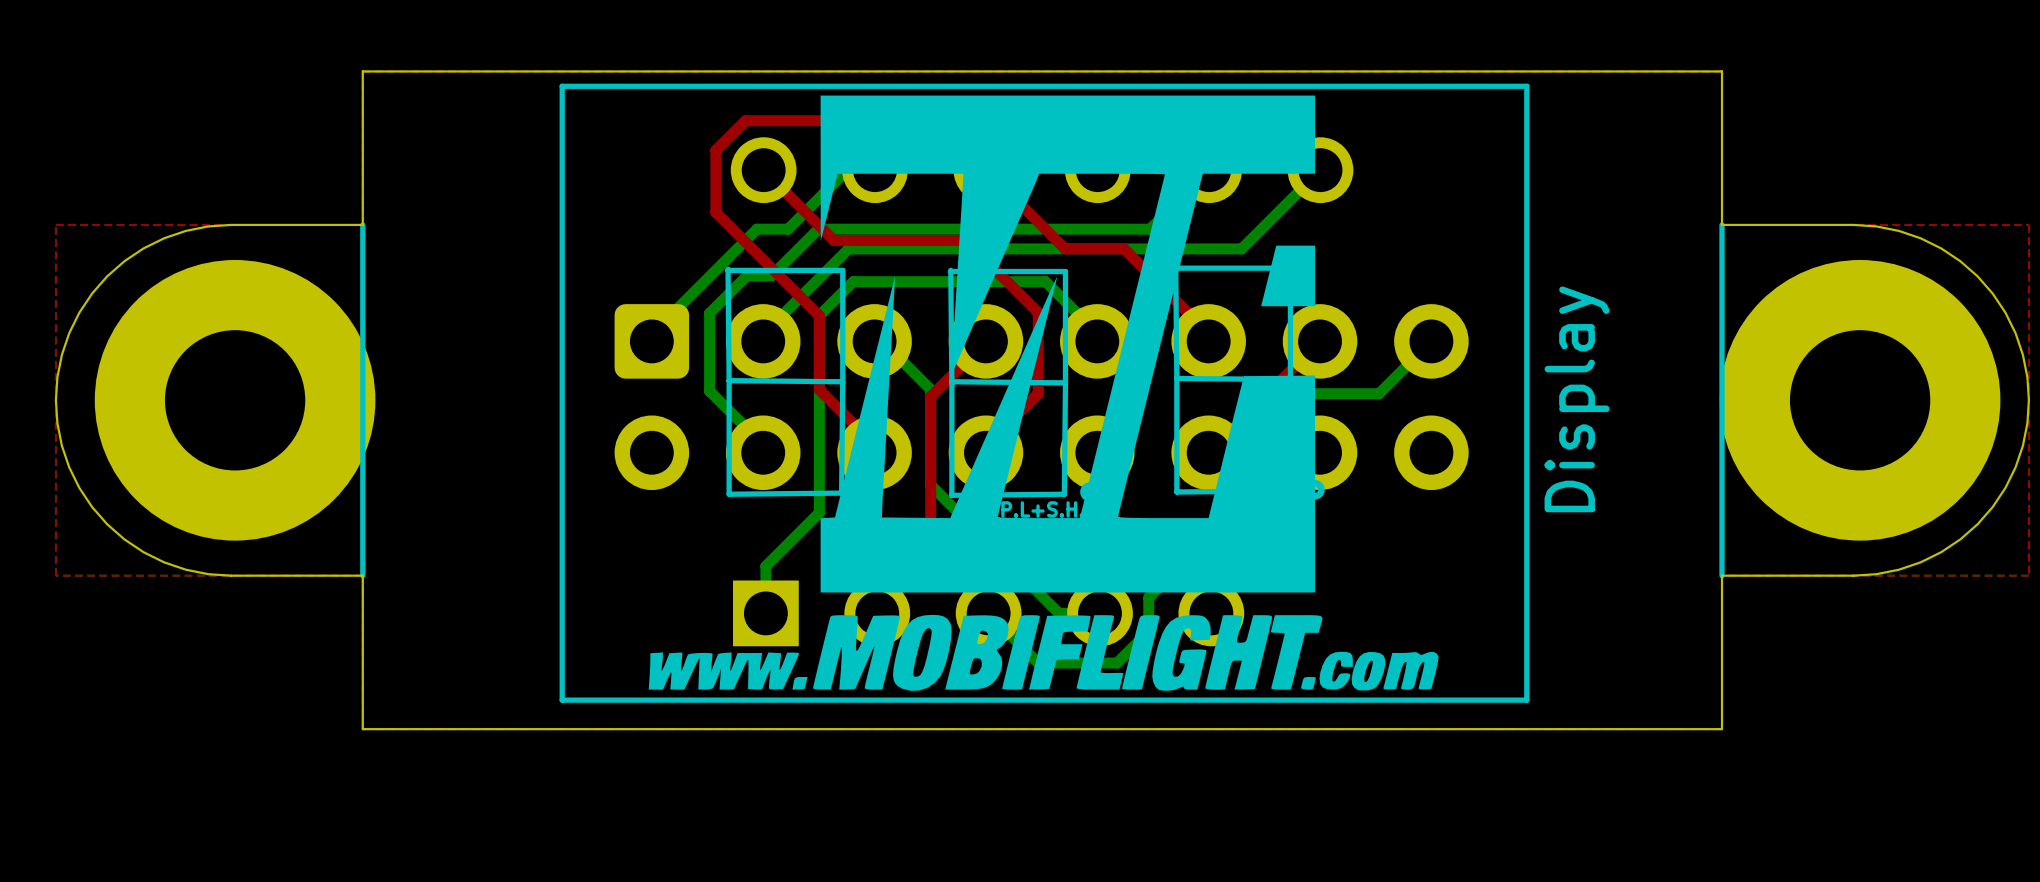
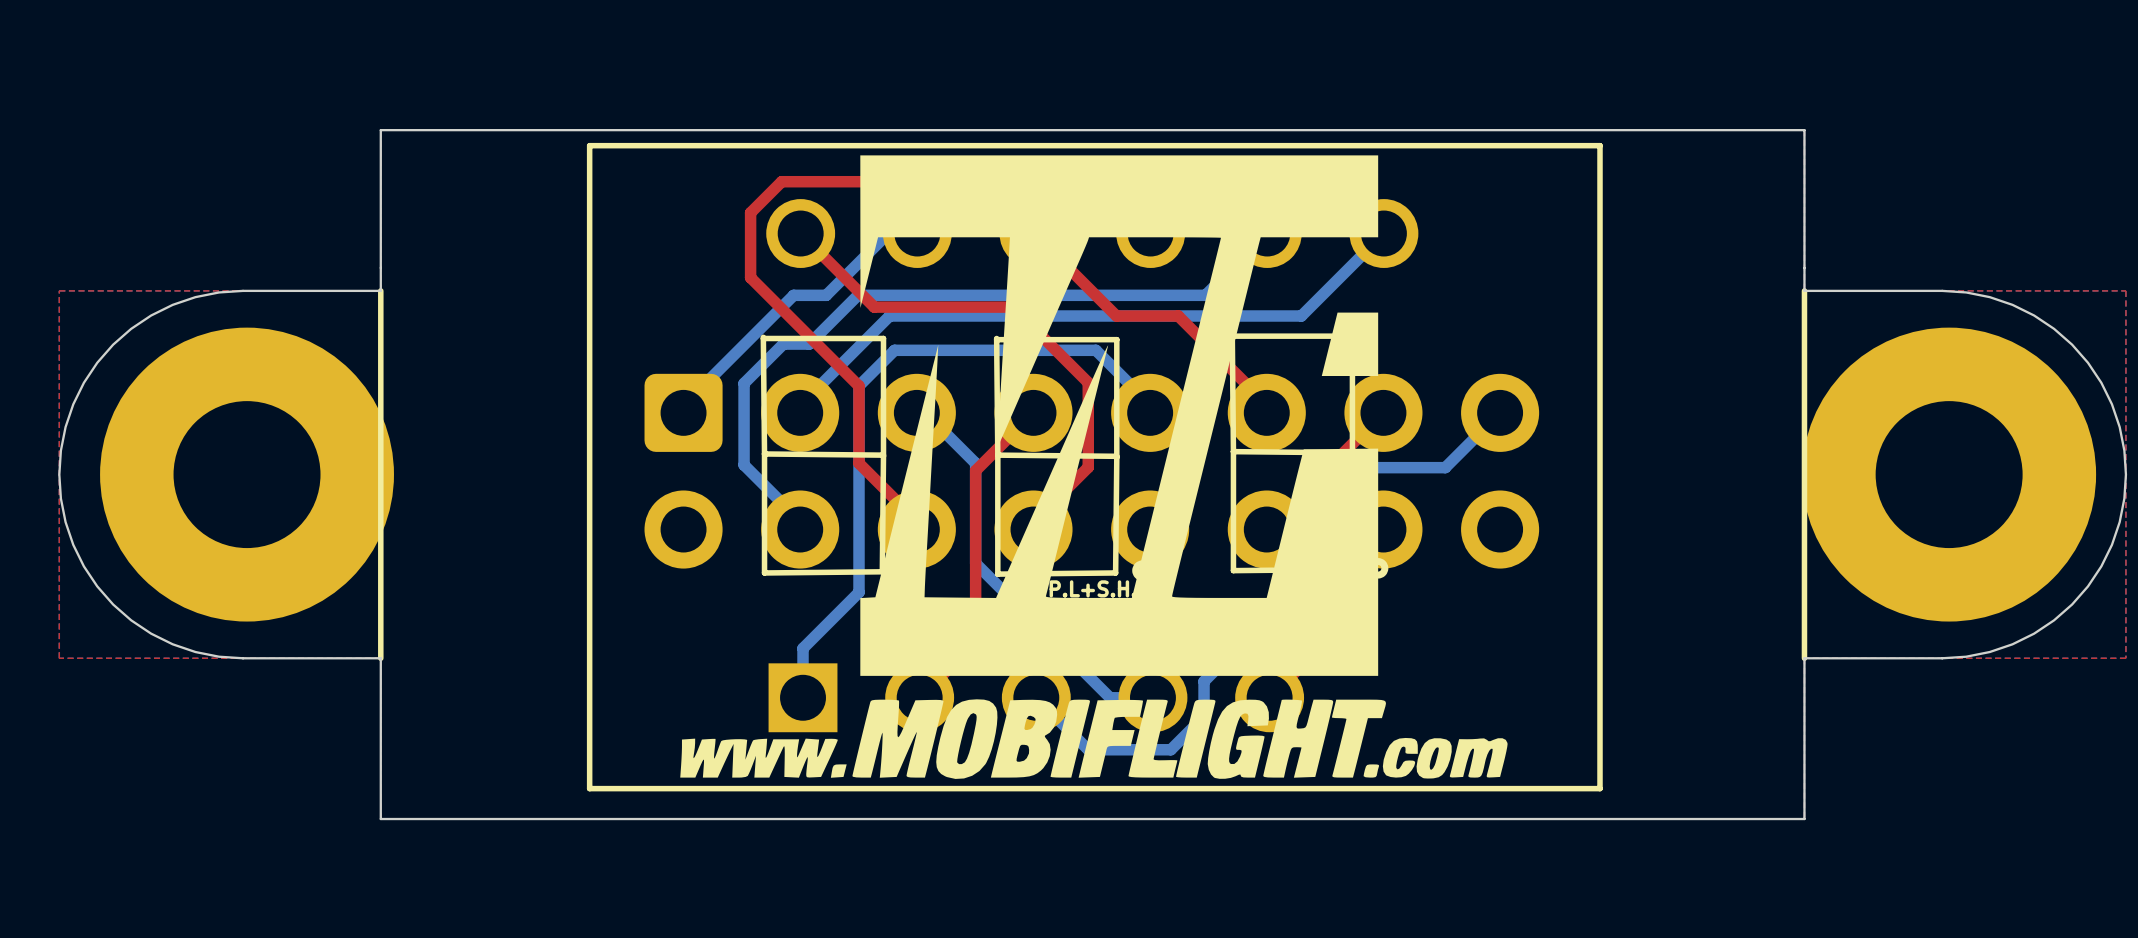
text: Display (1577, 399) -> none

